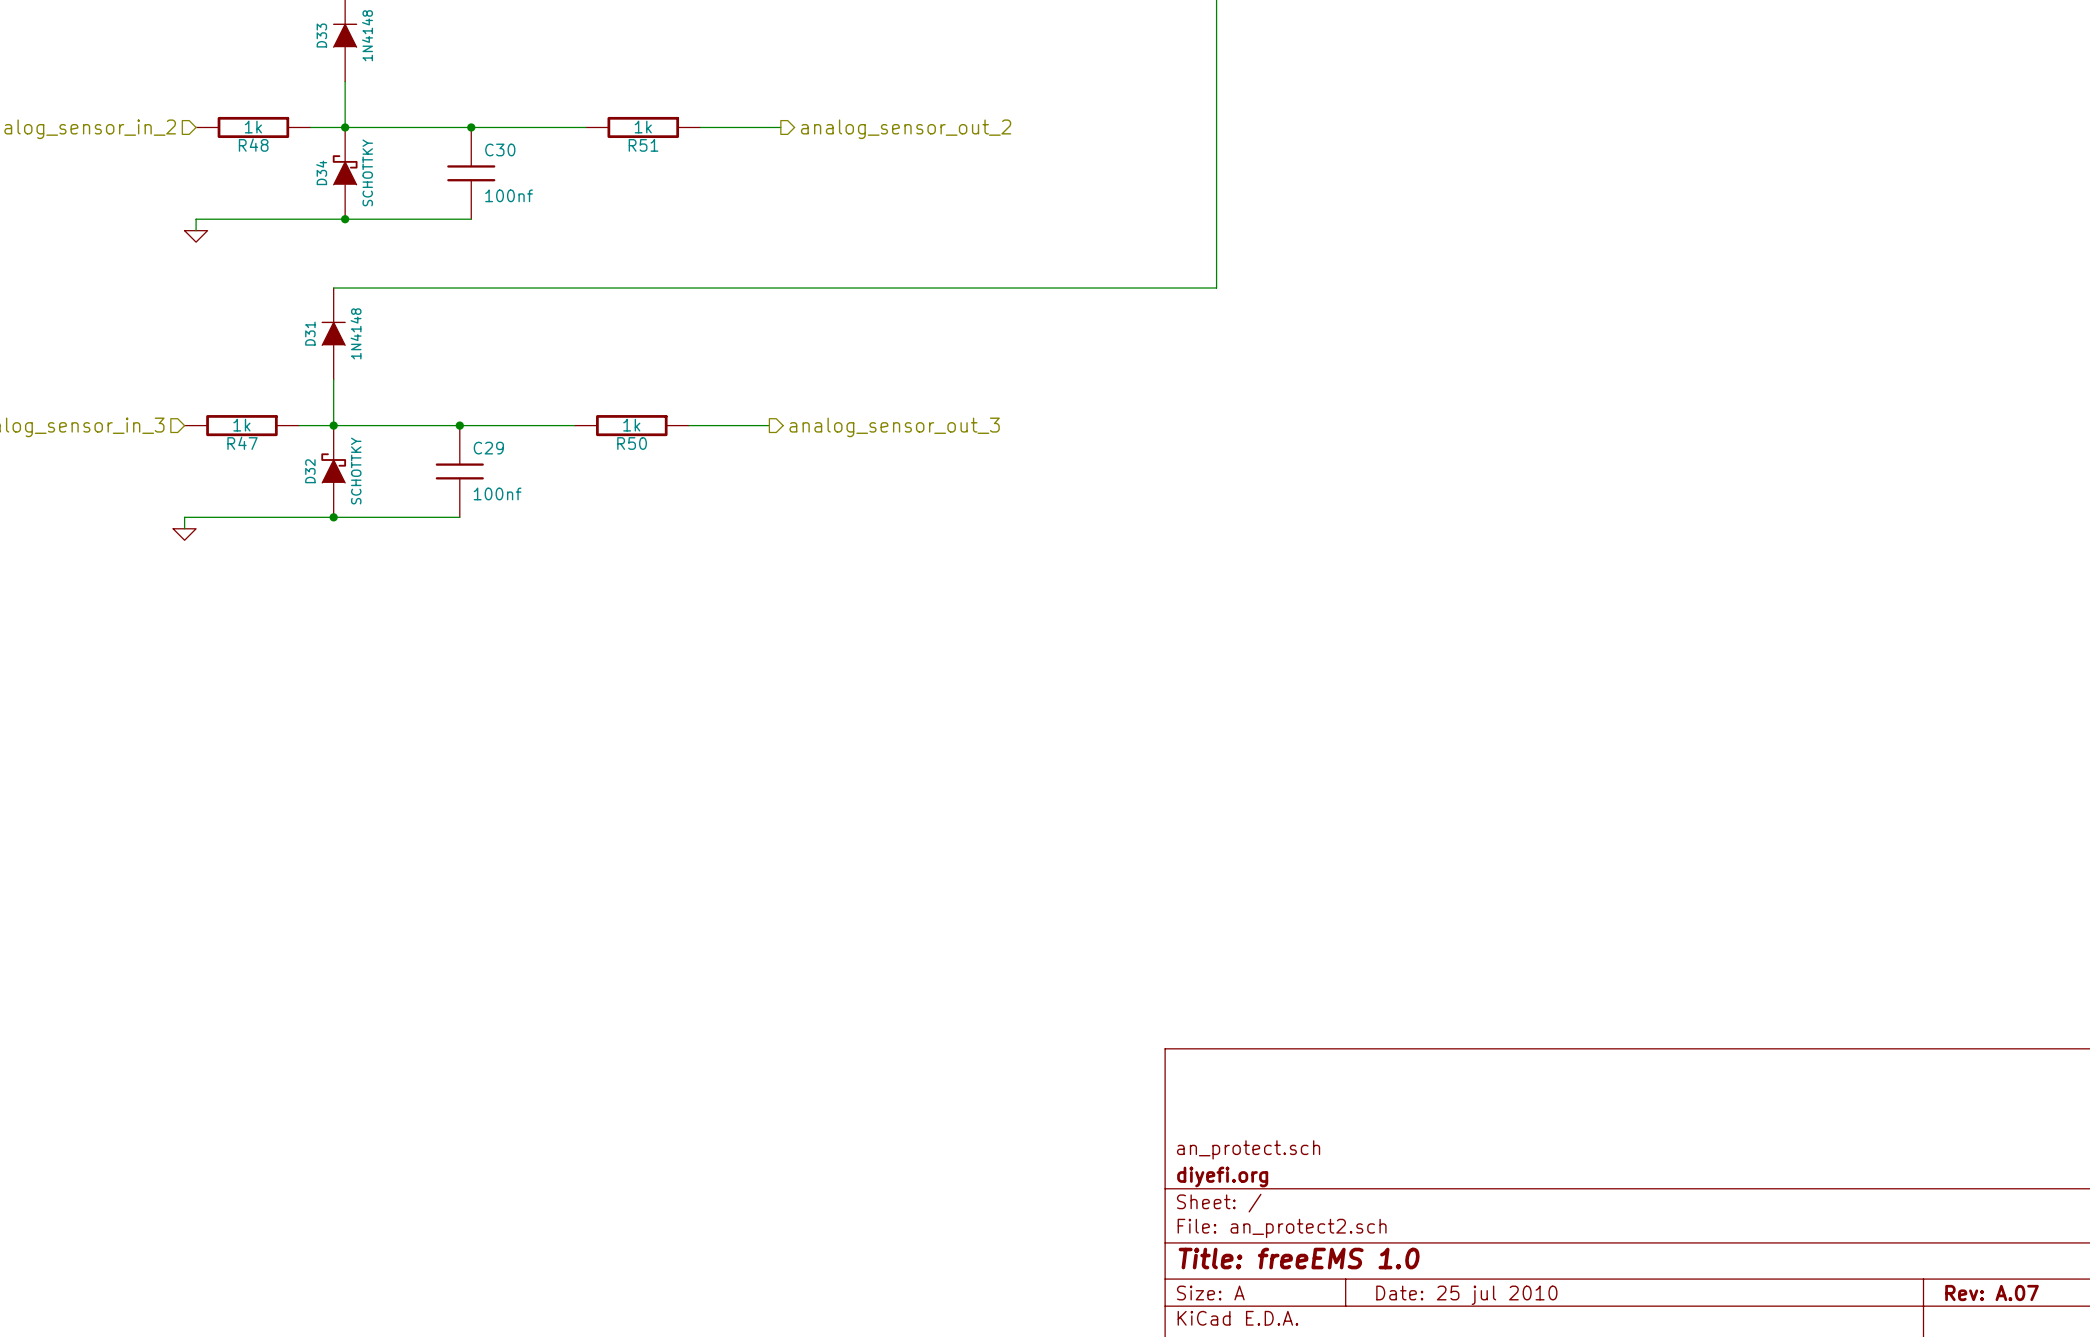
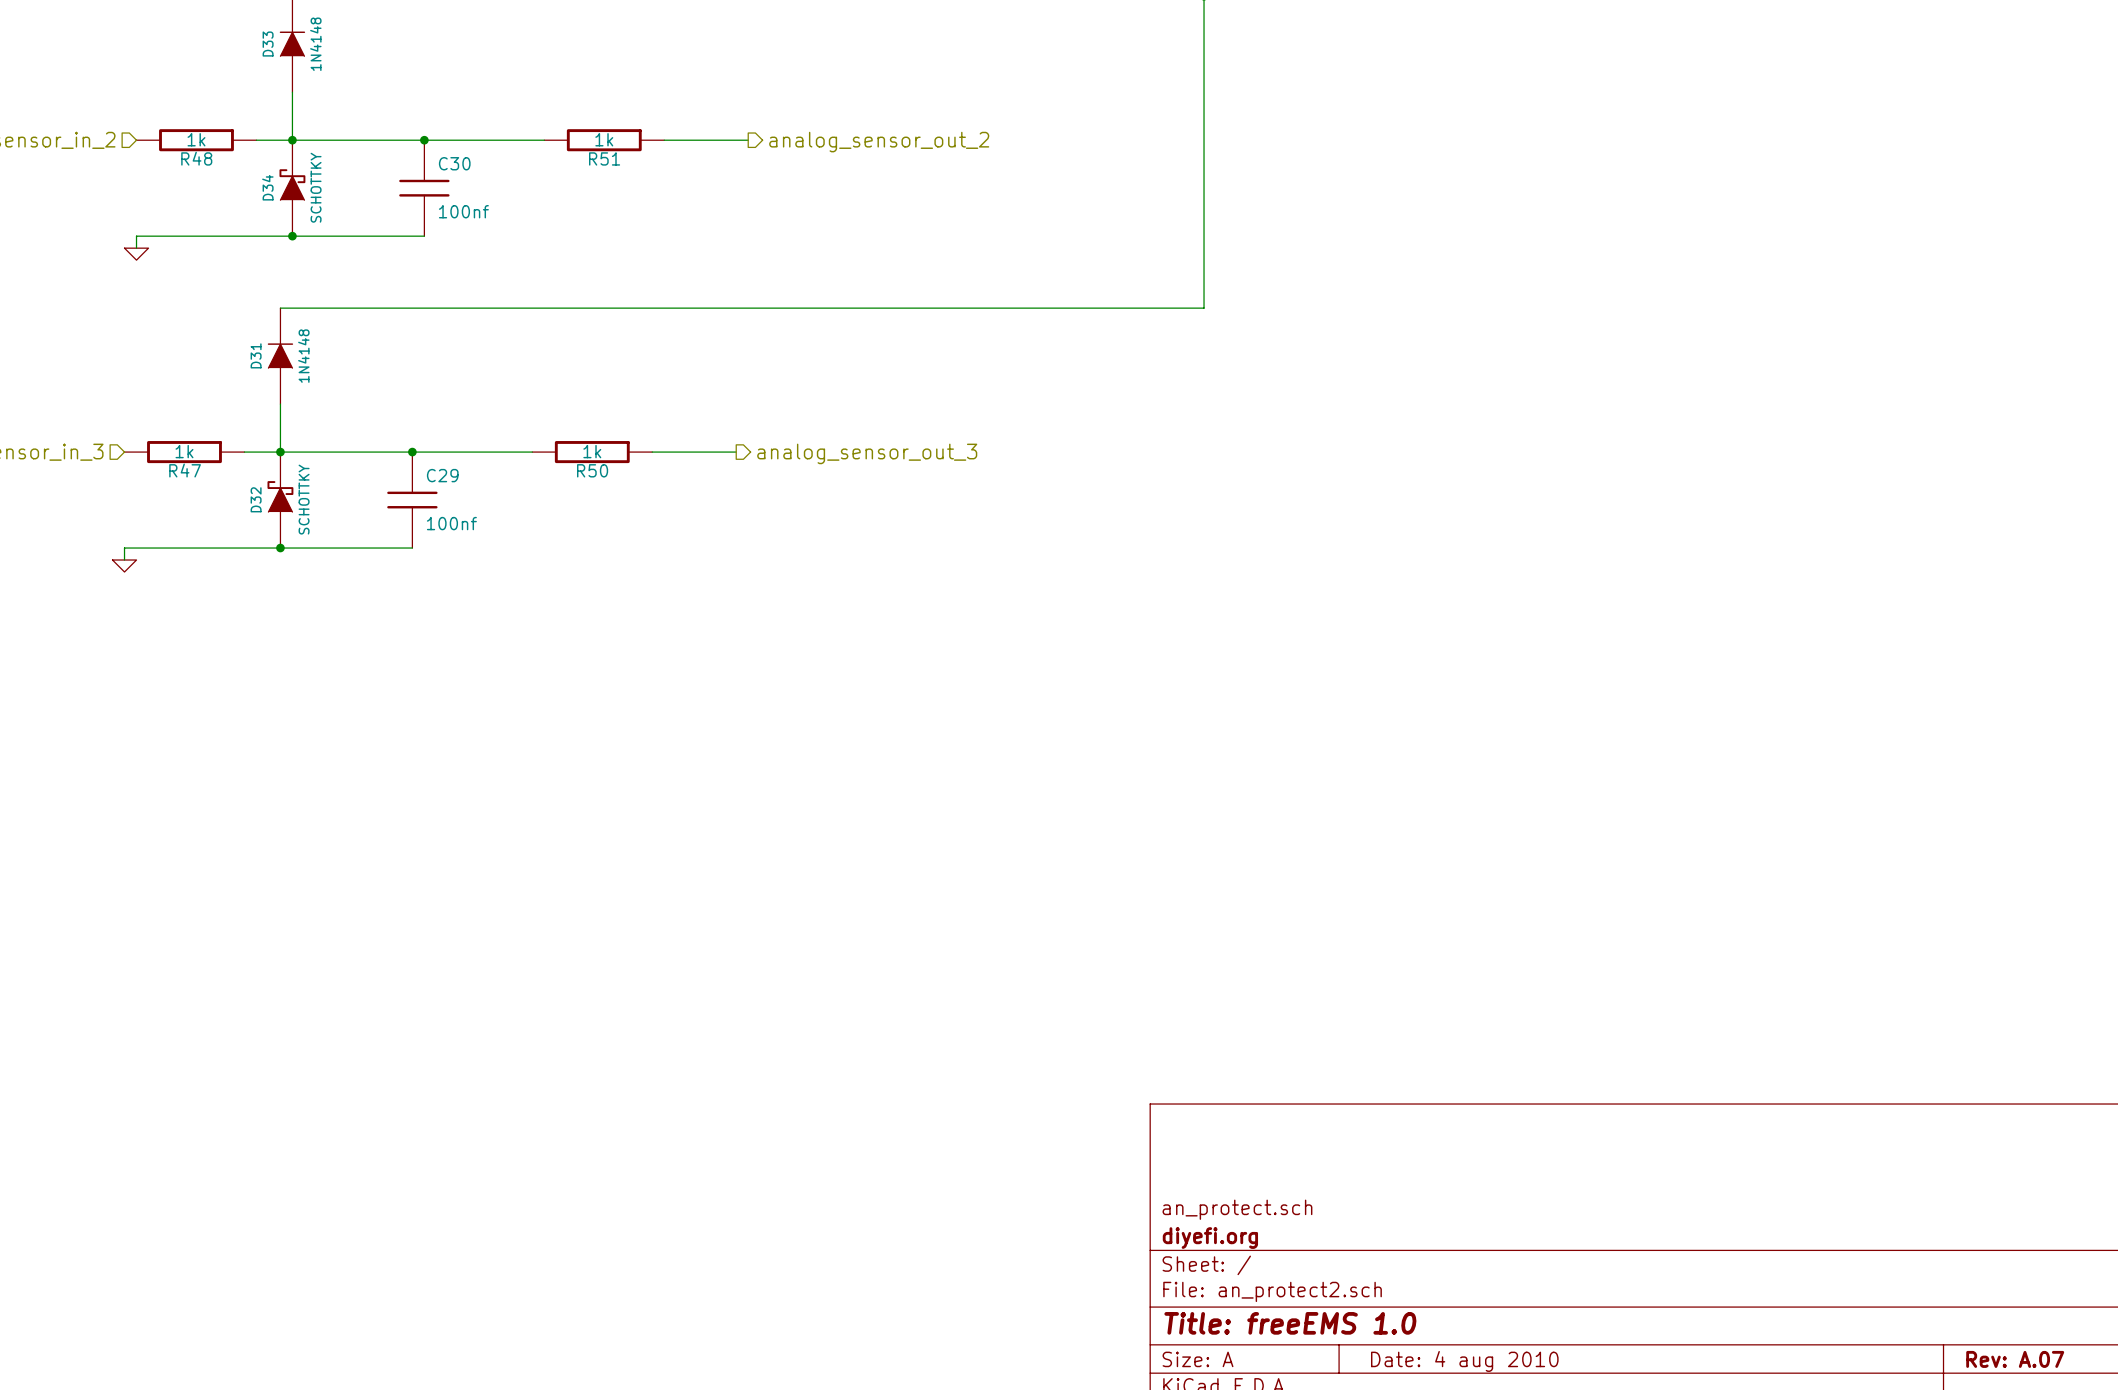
title block: Date: 25 jul 2010 (1466, 1295) -> Date: 4 aug 2010 (1464, 1361)

